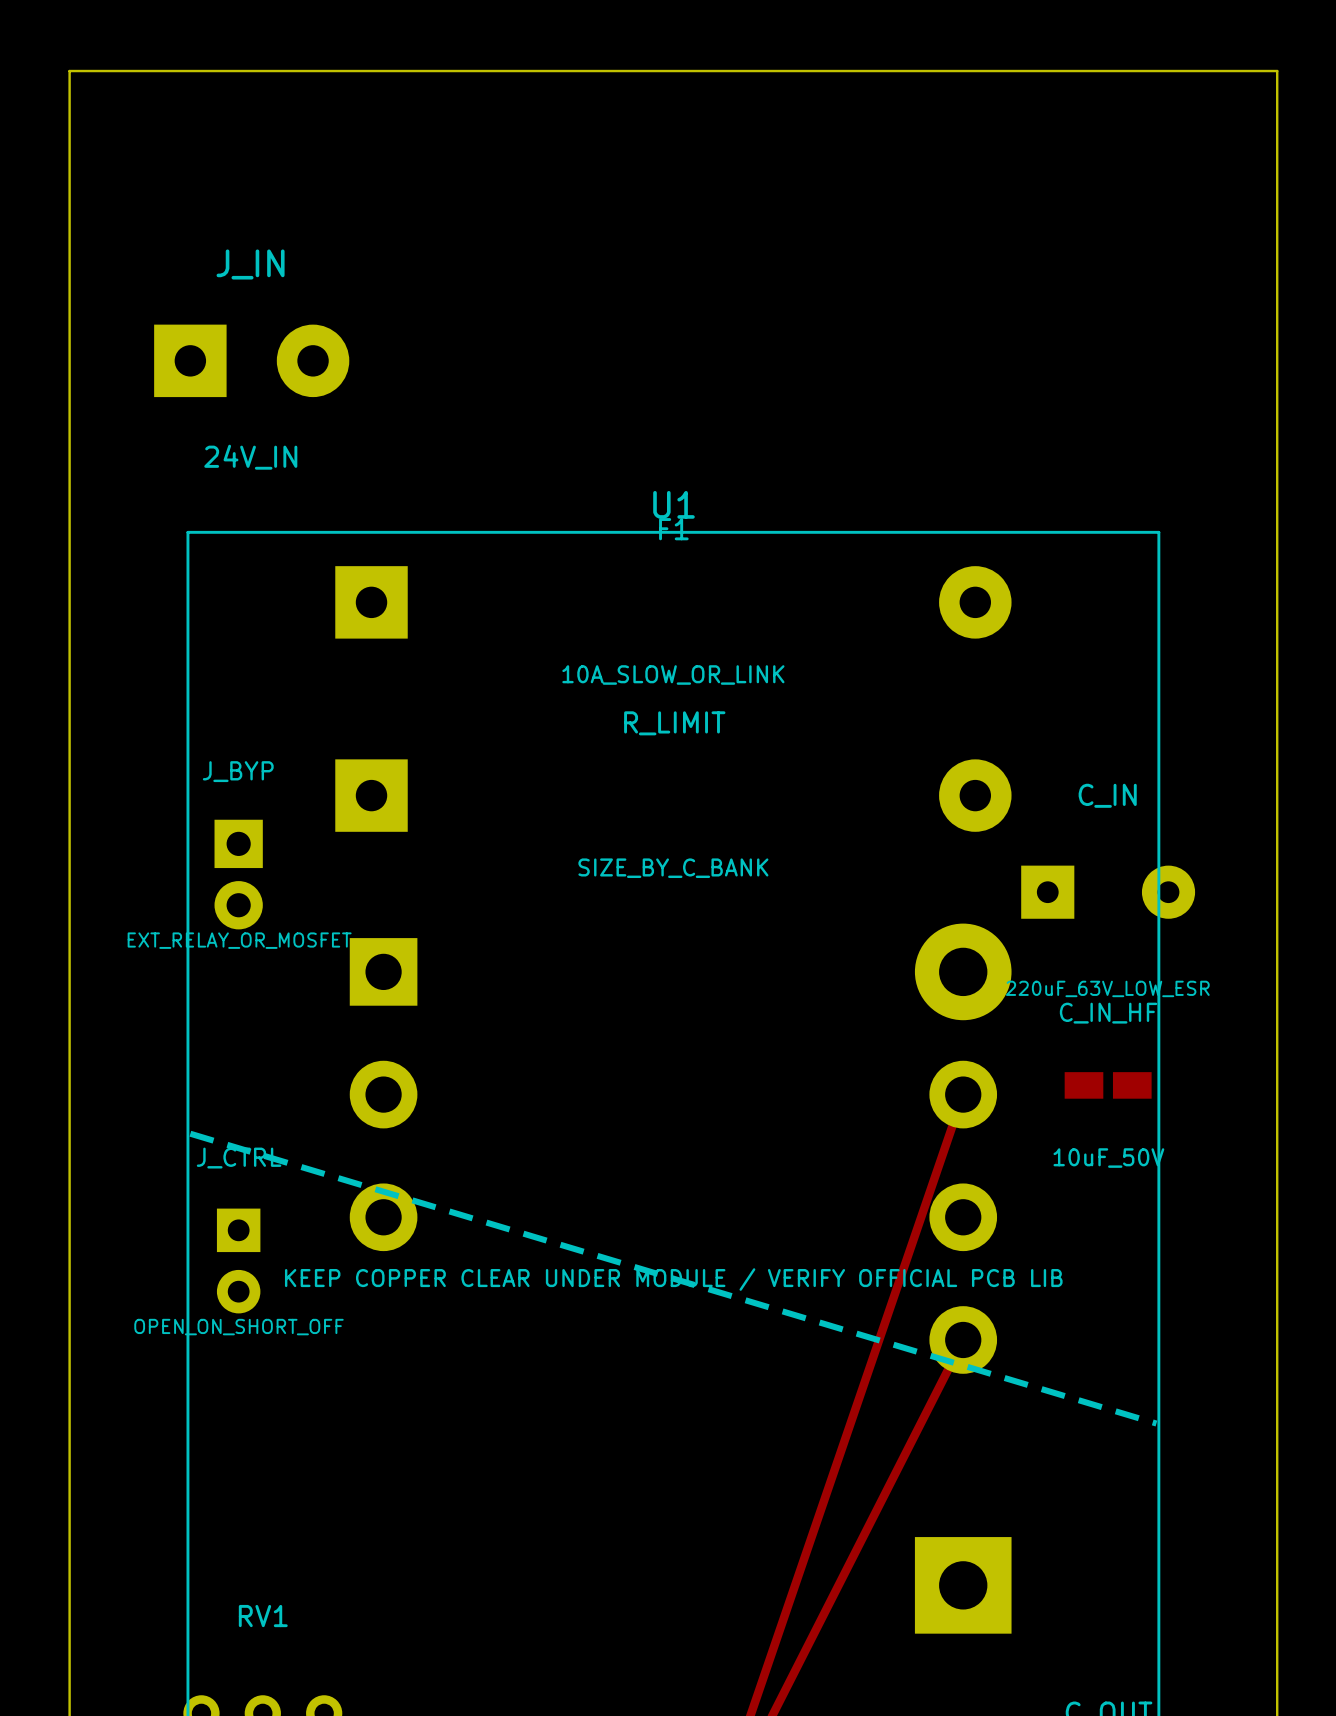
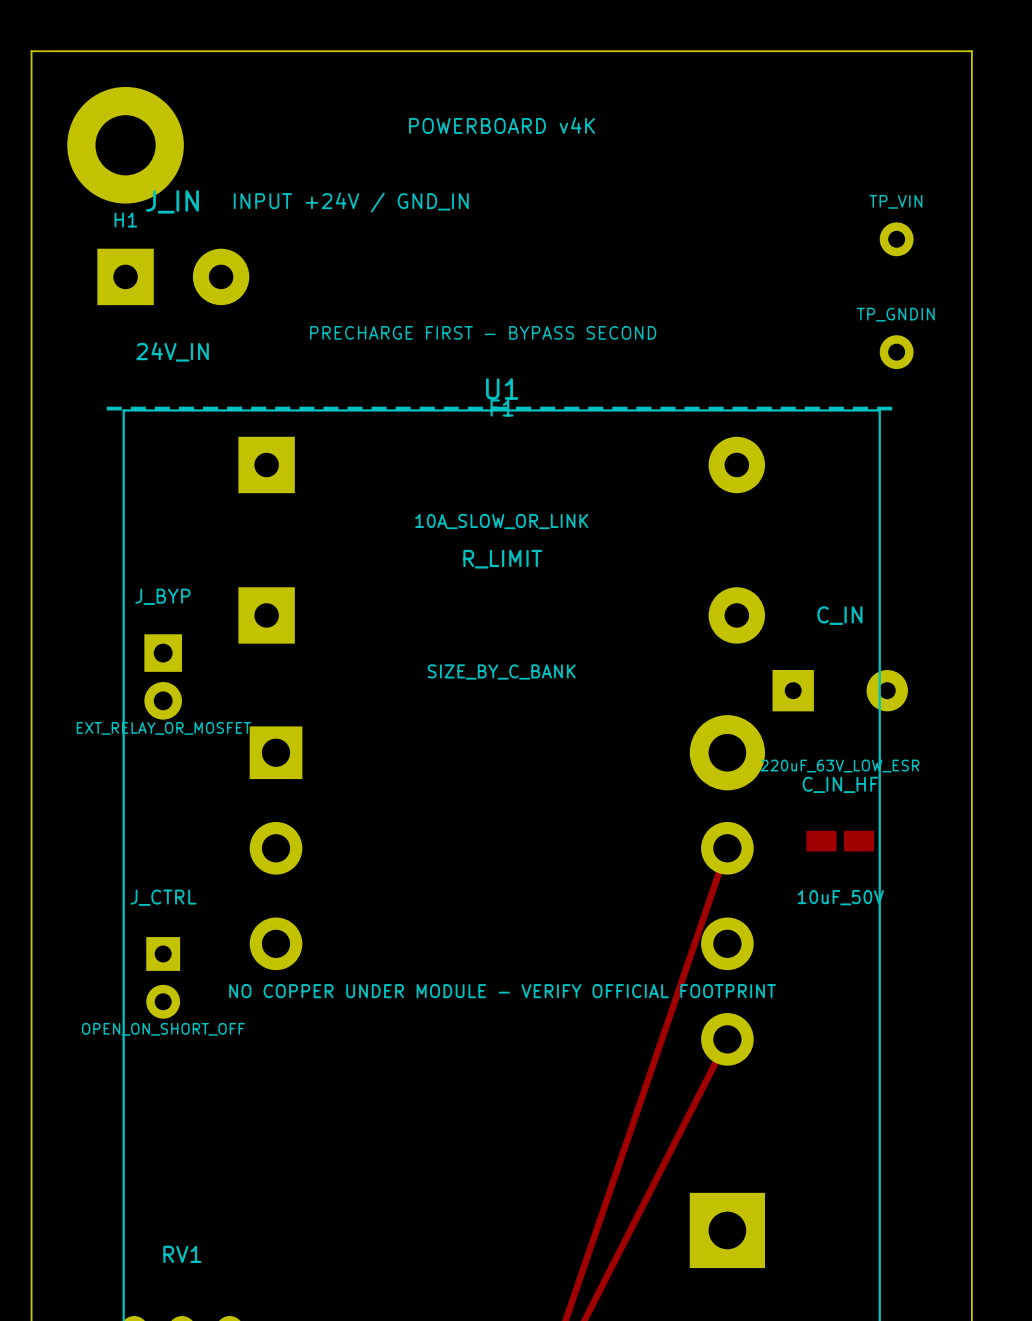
text: none -> POWERBOARD v4K (502, 125)
H1: none -> (125, 145)
text: none -> INPUT +24V / GND_IN (351, 202)
TP_VIN: none -> (896, 239)
text: none -> PRECHARGE FIRST - BYPASS SECOND (483, 332)
TP_GNDIN: none -> (896, 352)
line: none -> (106, 408) (896, 408)
line: (190, 1133) (1156, 1423) -> none
U1 text: KEEP COPPER CLEAR UNDER MODULE / VERIFY OFFICIAL PCB LIB (673, 1279) -> NO COPPER UNDER MODULE - VERIFY OFFICIAL FOOTPRINT (502, 991)

